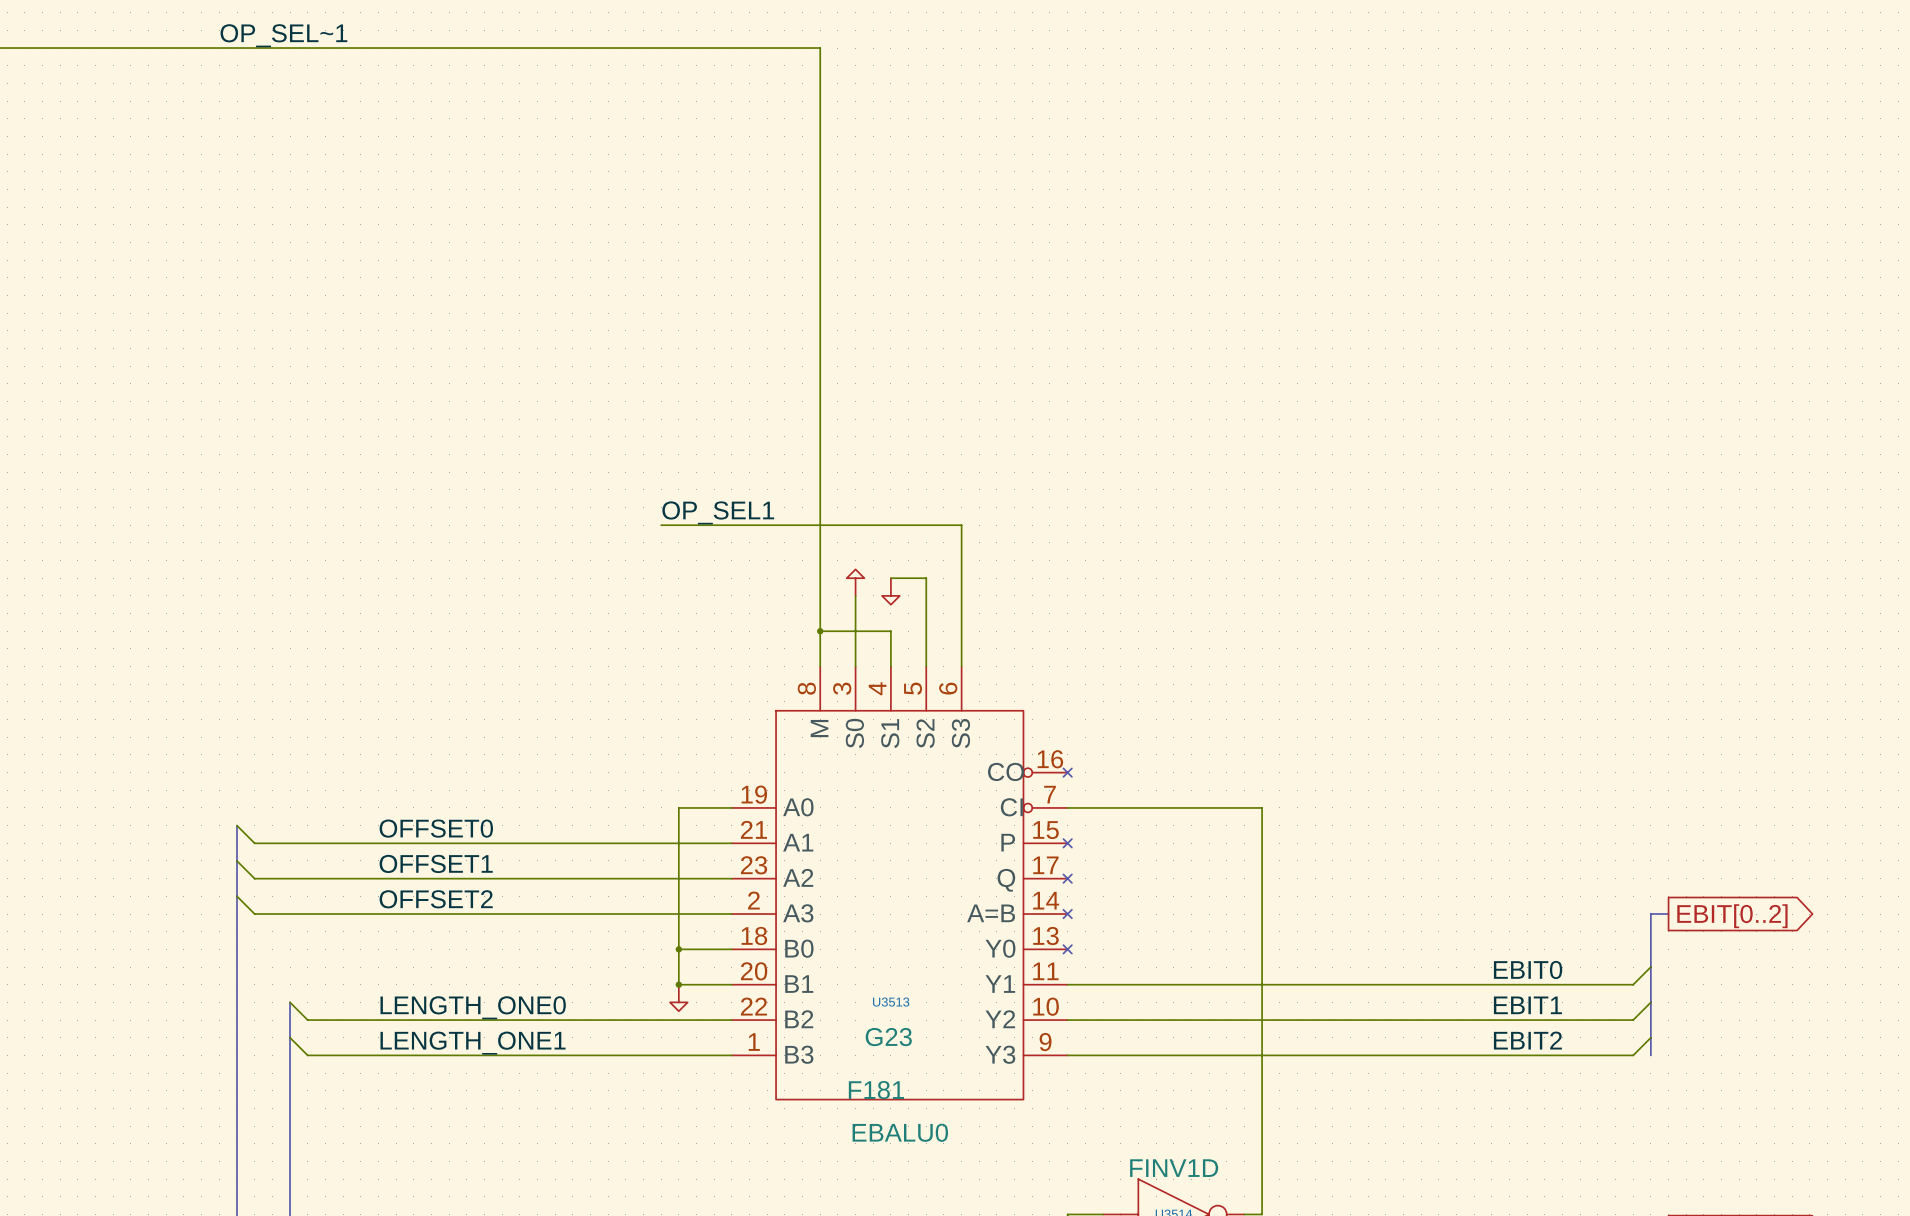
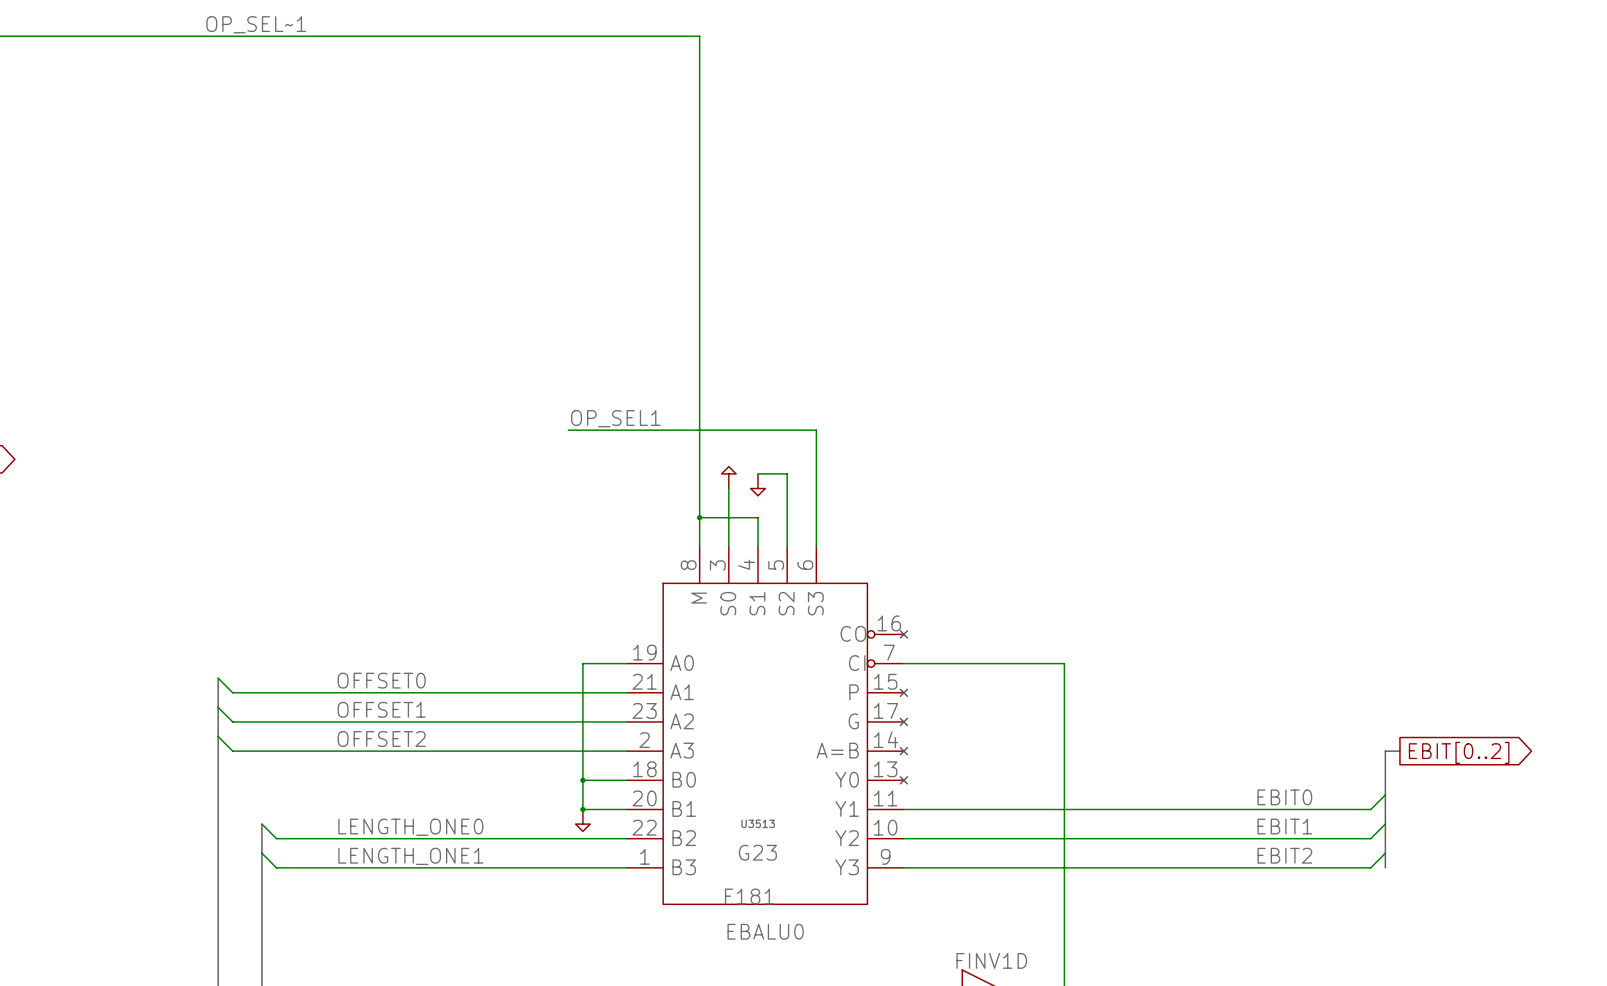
U3513 pin name: Q (1006, 880) -> G (853, 721)

